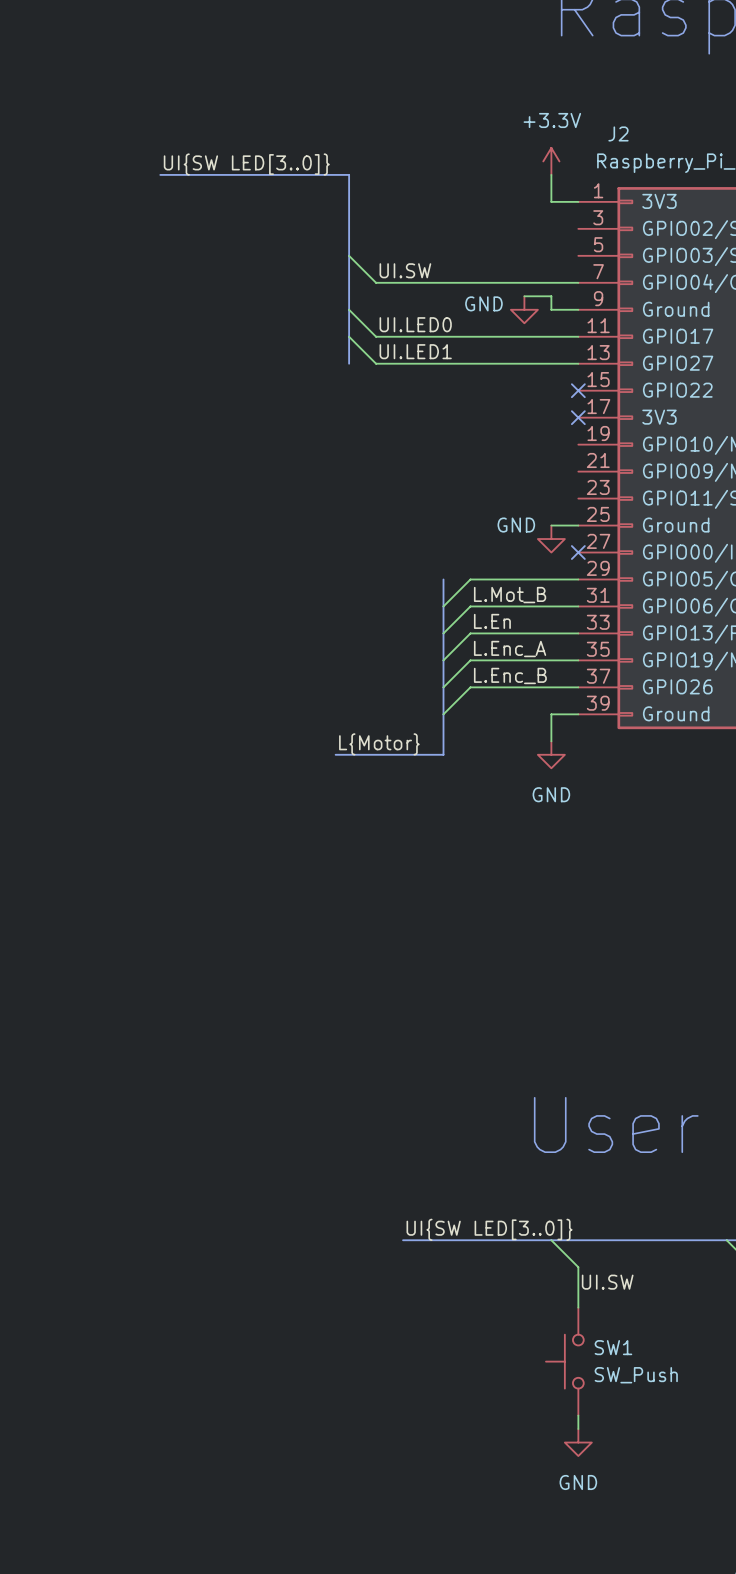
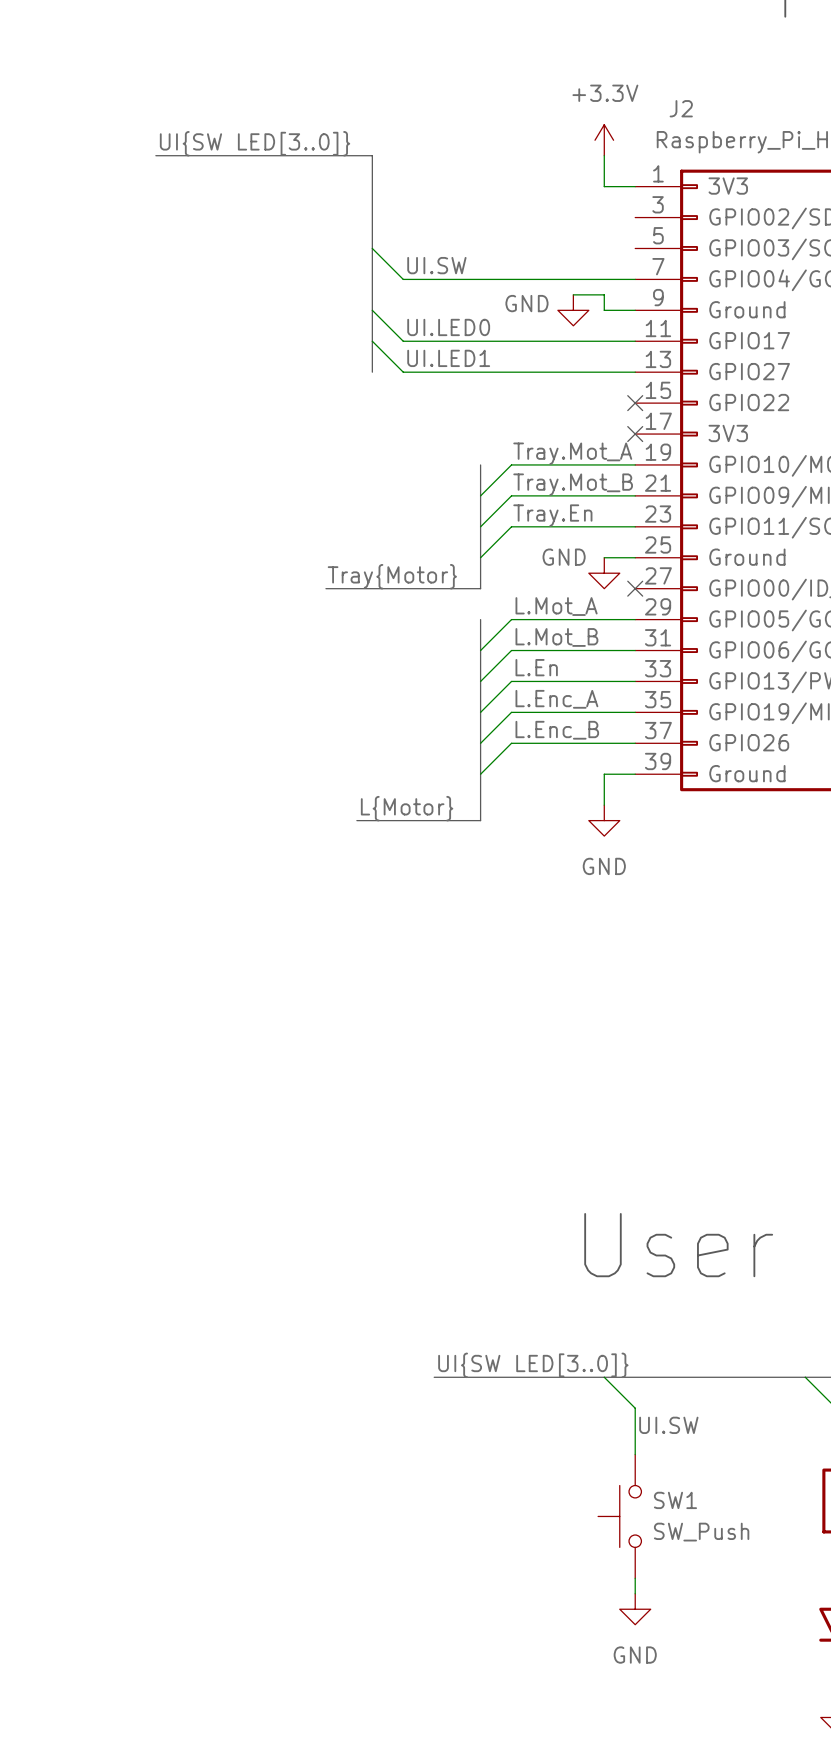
label: none -> Tray.Mot_A (572, 453)
bus: none -> (480, 464) (480, 588) (325, 588)
wire: none -> (635, 464) (511, 464) (480, 495)
label: none -> Tray.Mot_B (573, 484)
wire: none -> (635, 495) (511, 495) (480, 526)
label: none -> Tray.En (552, 515)
wire: none -> (635, 526) (511, 526) (480, 557)
label: none -> Tray{Motor} (392, 576)
label: none -> L.Mot_A (556, 606)

